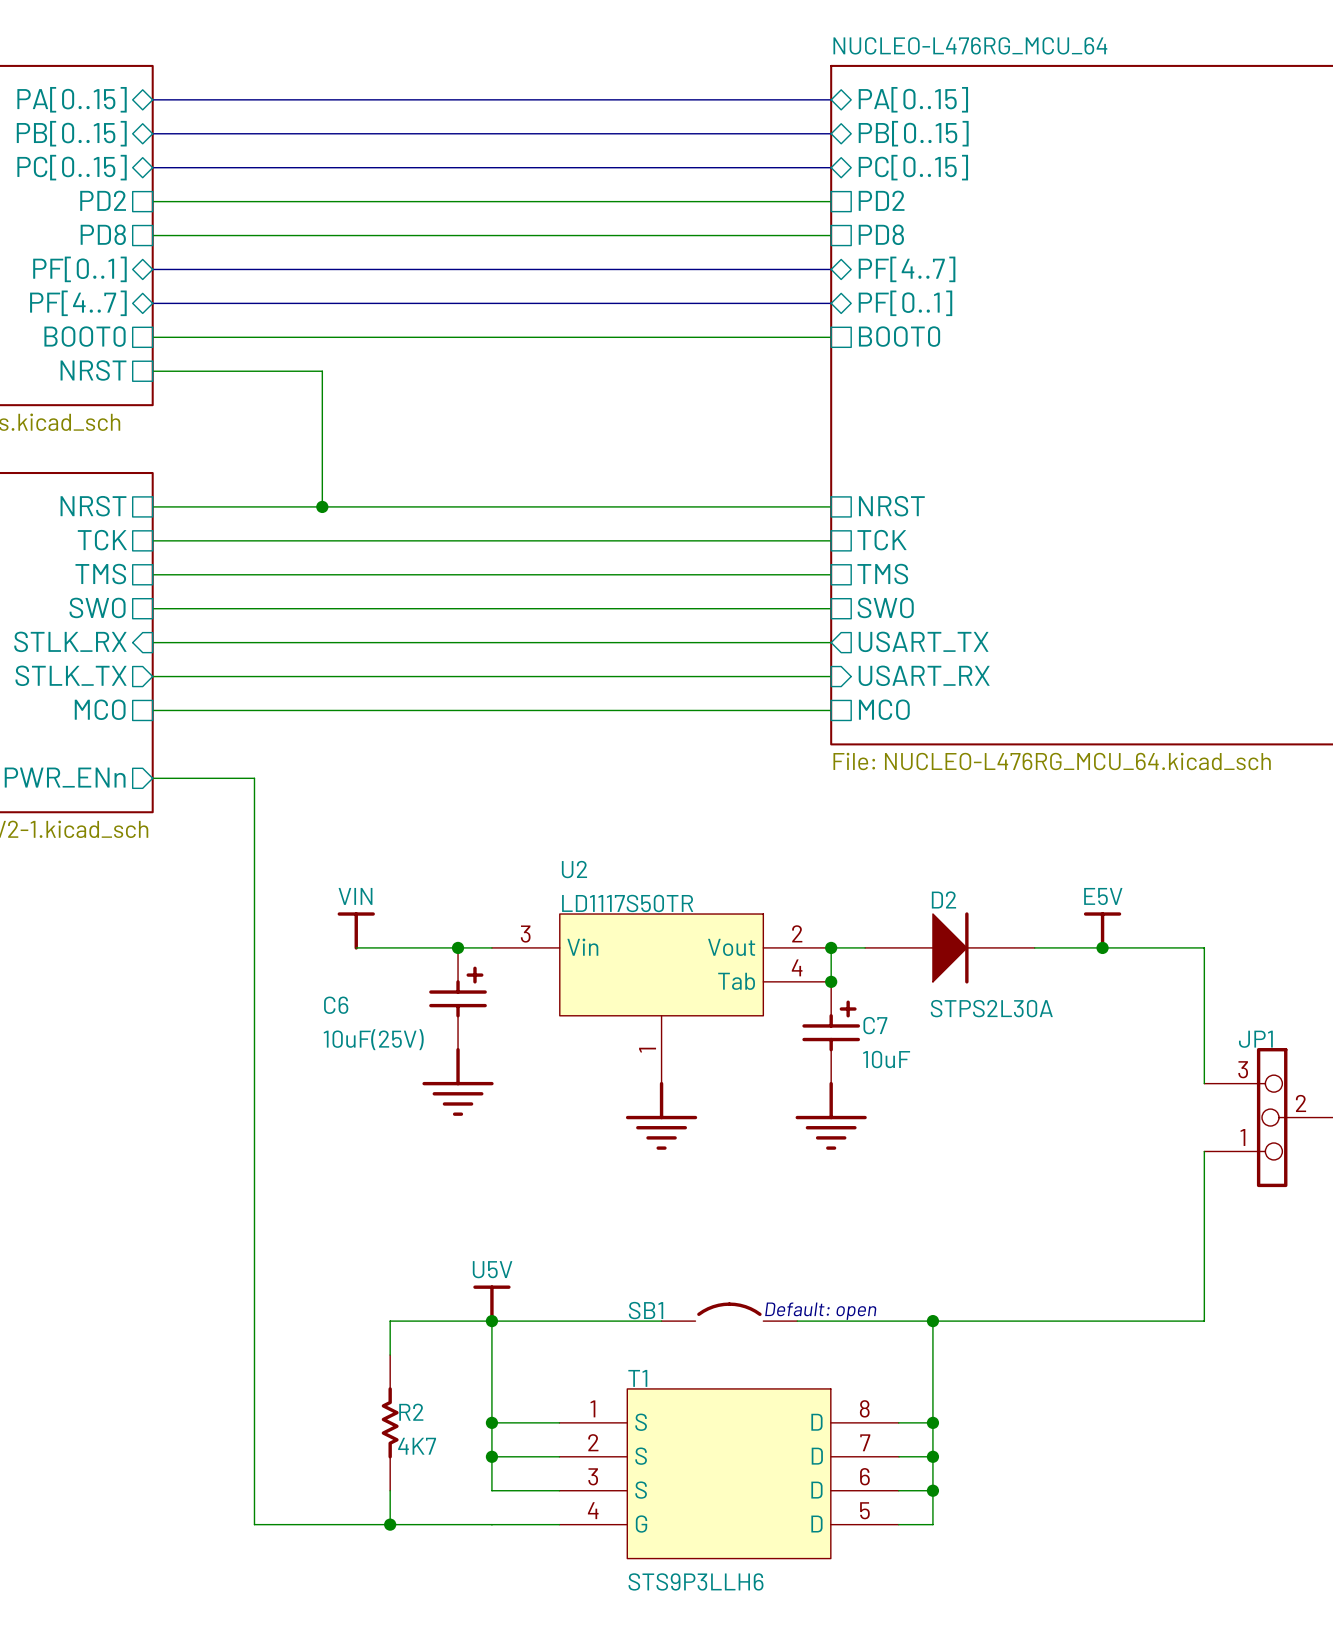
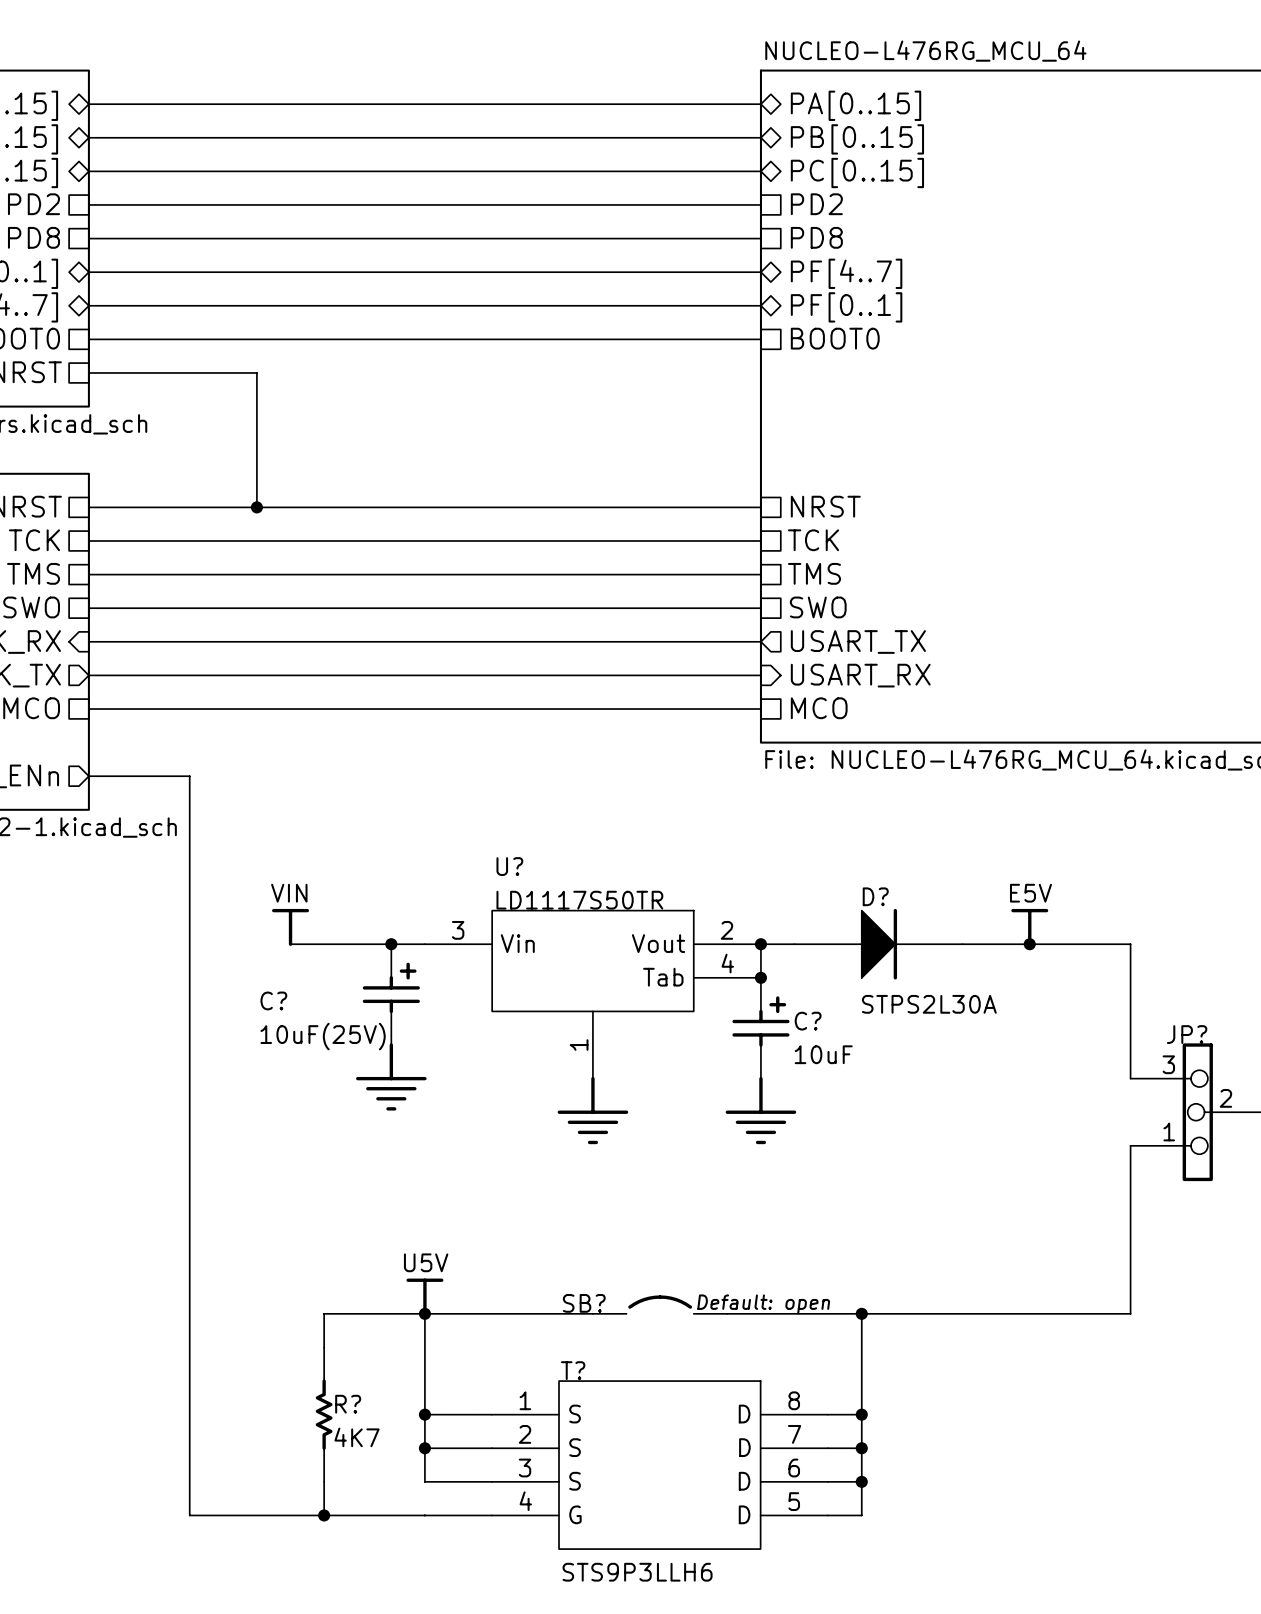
U2 name: U2 (574, 869) -> U? (509, 866)
D2 name: D2 (943, 899) -> D? (875, 896)
C6 name: C6 (336, 1005) -> C? (273, 1000)
C7 name: C7 (875, 1025) -> C? (808, 1021)
JP1 name: JP1 (1255, 1039) -> JP? (1187, 1034)
SB1 name: SB1 (646, 1310) -> SB? (584, 1303)
T1 name: T1 (637, 1378) -> T? (573, 1370)
R2 name: R2 (411, 1412) -> R? (348, 1404)

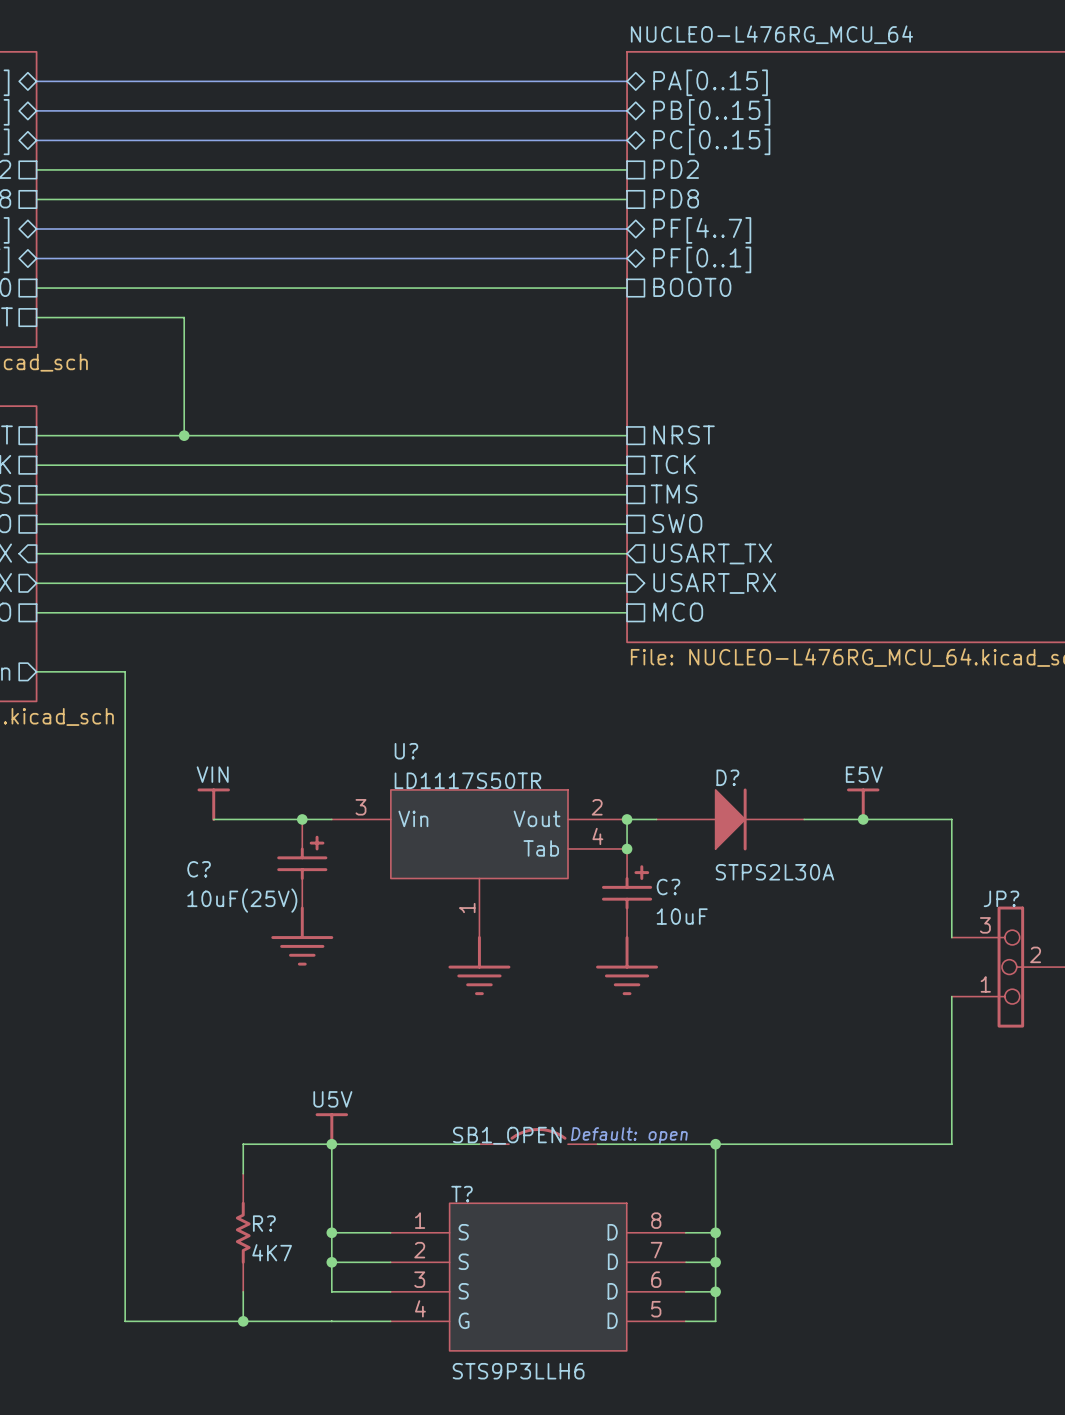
SB? name: SB? (584, 1303) -> SB1_OPEN (507, 1135)

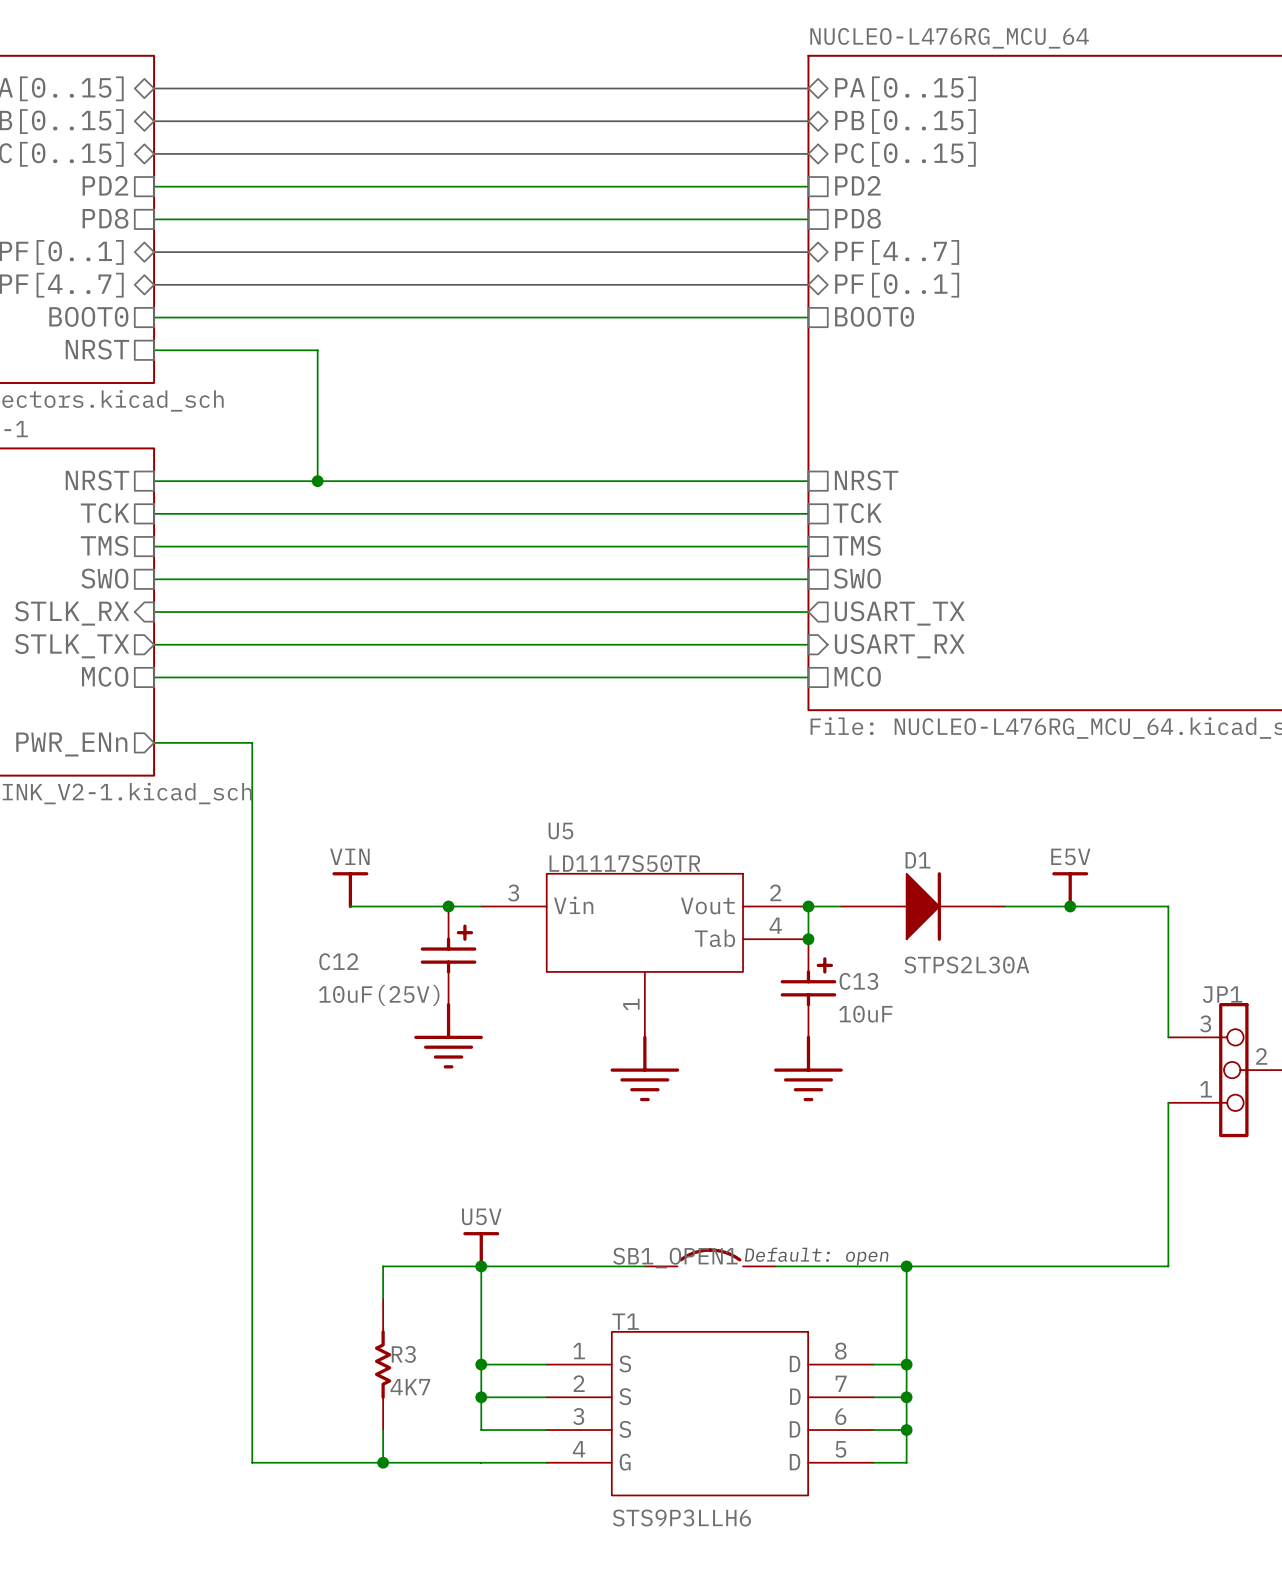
U? name: U? (406, 751) -> U5 (560, 831)
D? name: D? (727, 777) -> D1 (917, 860)
C? name: C? (199, 869) -> C12 (338, 961)
C? name: C? (668, 887) -> C13 (858, 981)
JP? name: JP? (1001, 898) -> JP1 (1222, 994)
SB1_OPEN name: SB1_OPEN (507, 1135) -> SB1_OPEN1 (675, 1258)
T? name: T? (462, 1194) -> T1 (625, 1321)
R? name: R? (264, 1223) -> R3 (403, 1354)

